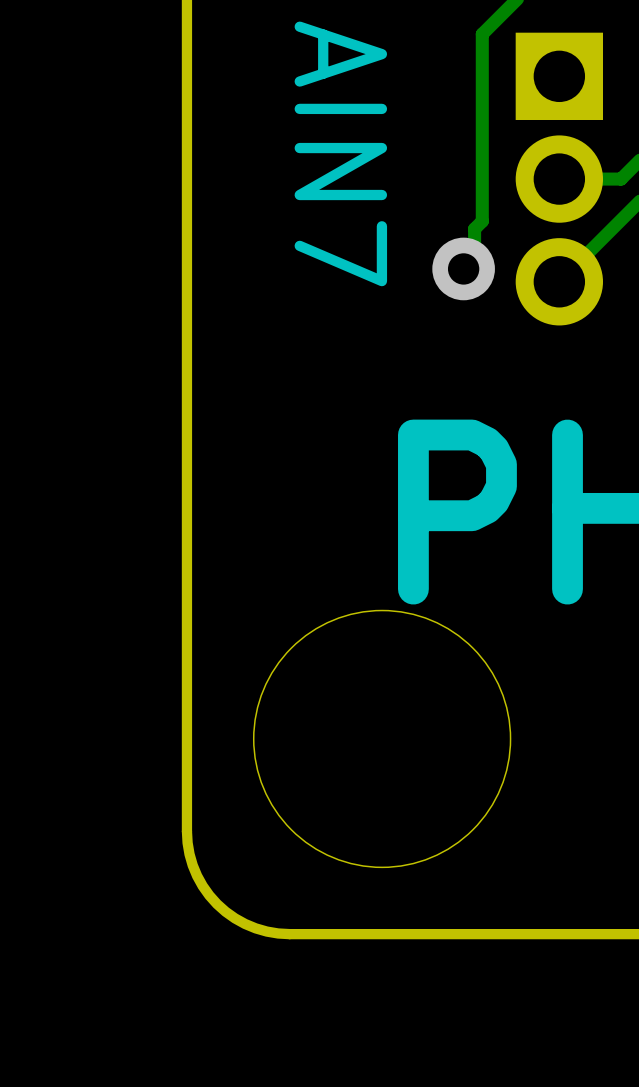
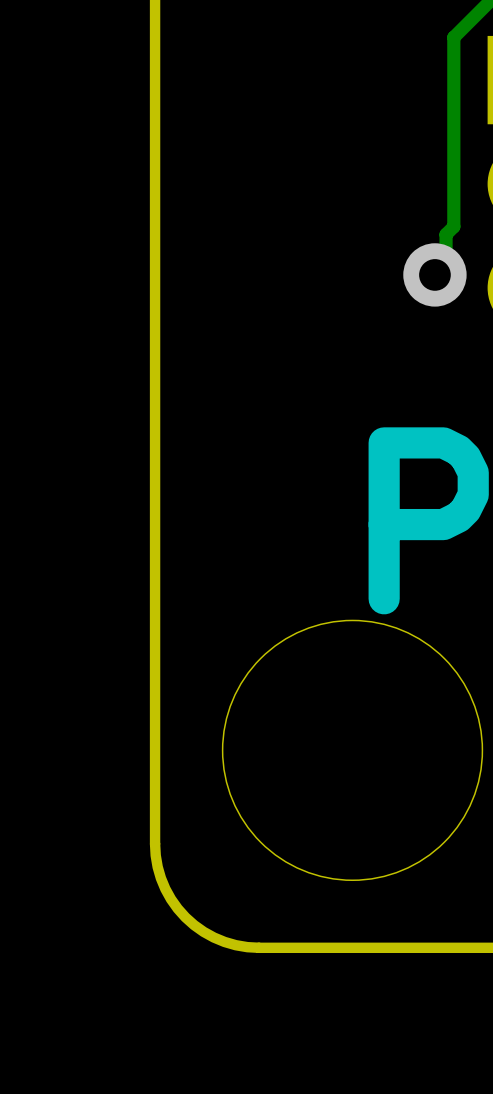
text: AIN7 (340, 153) -> none

